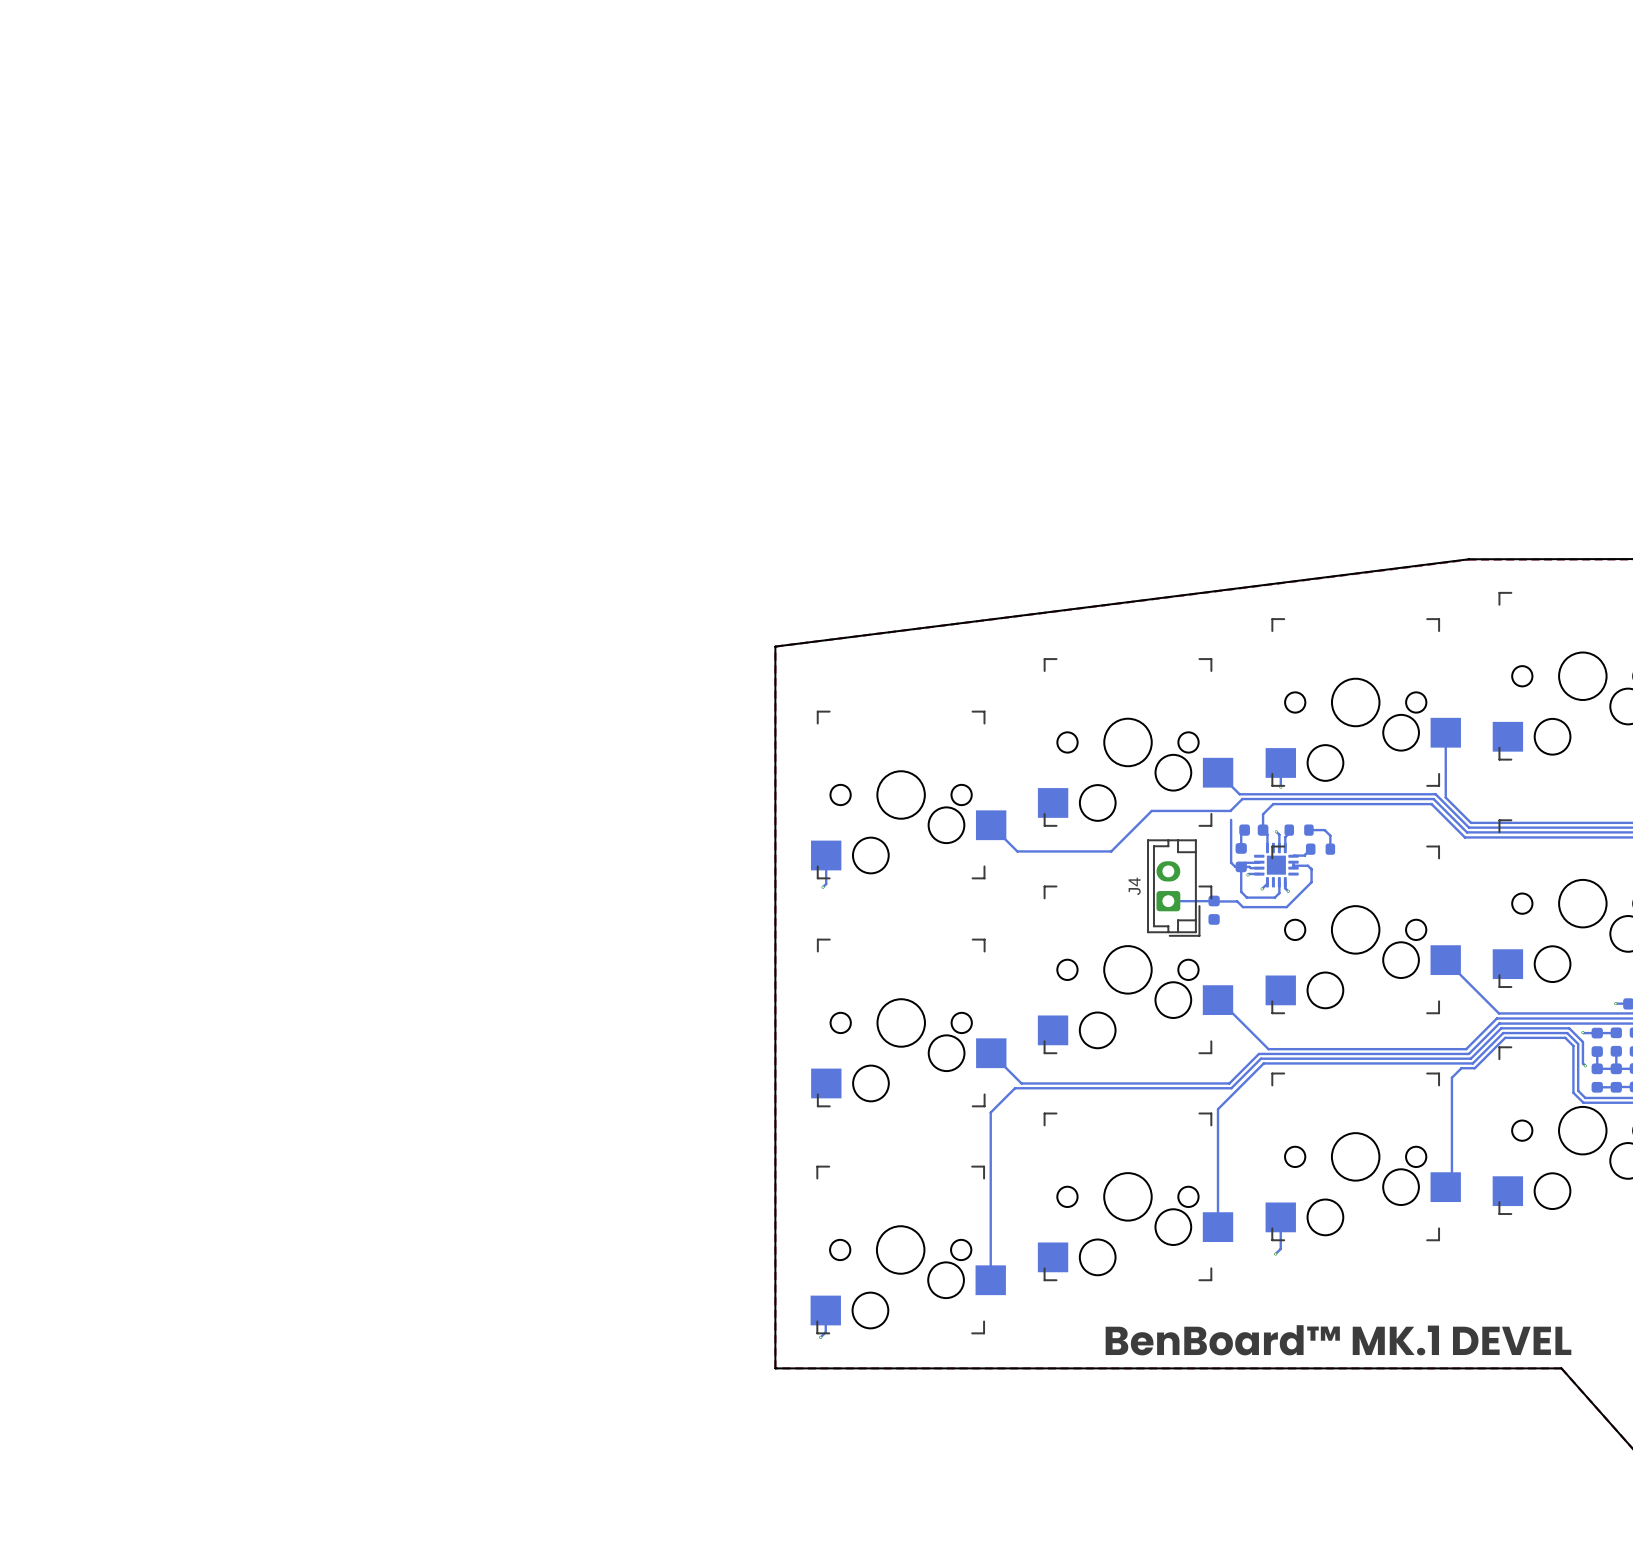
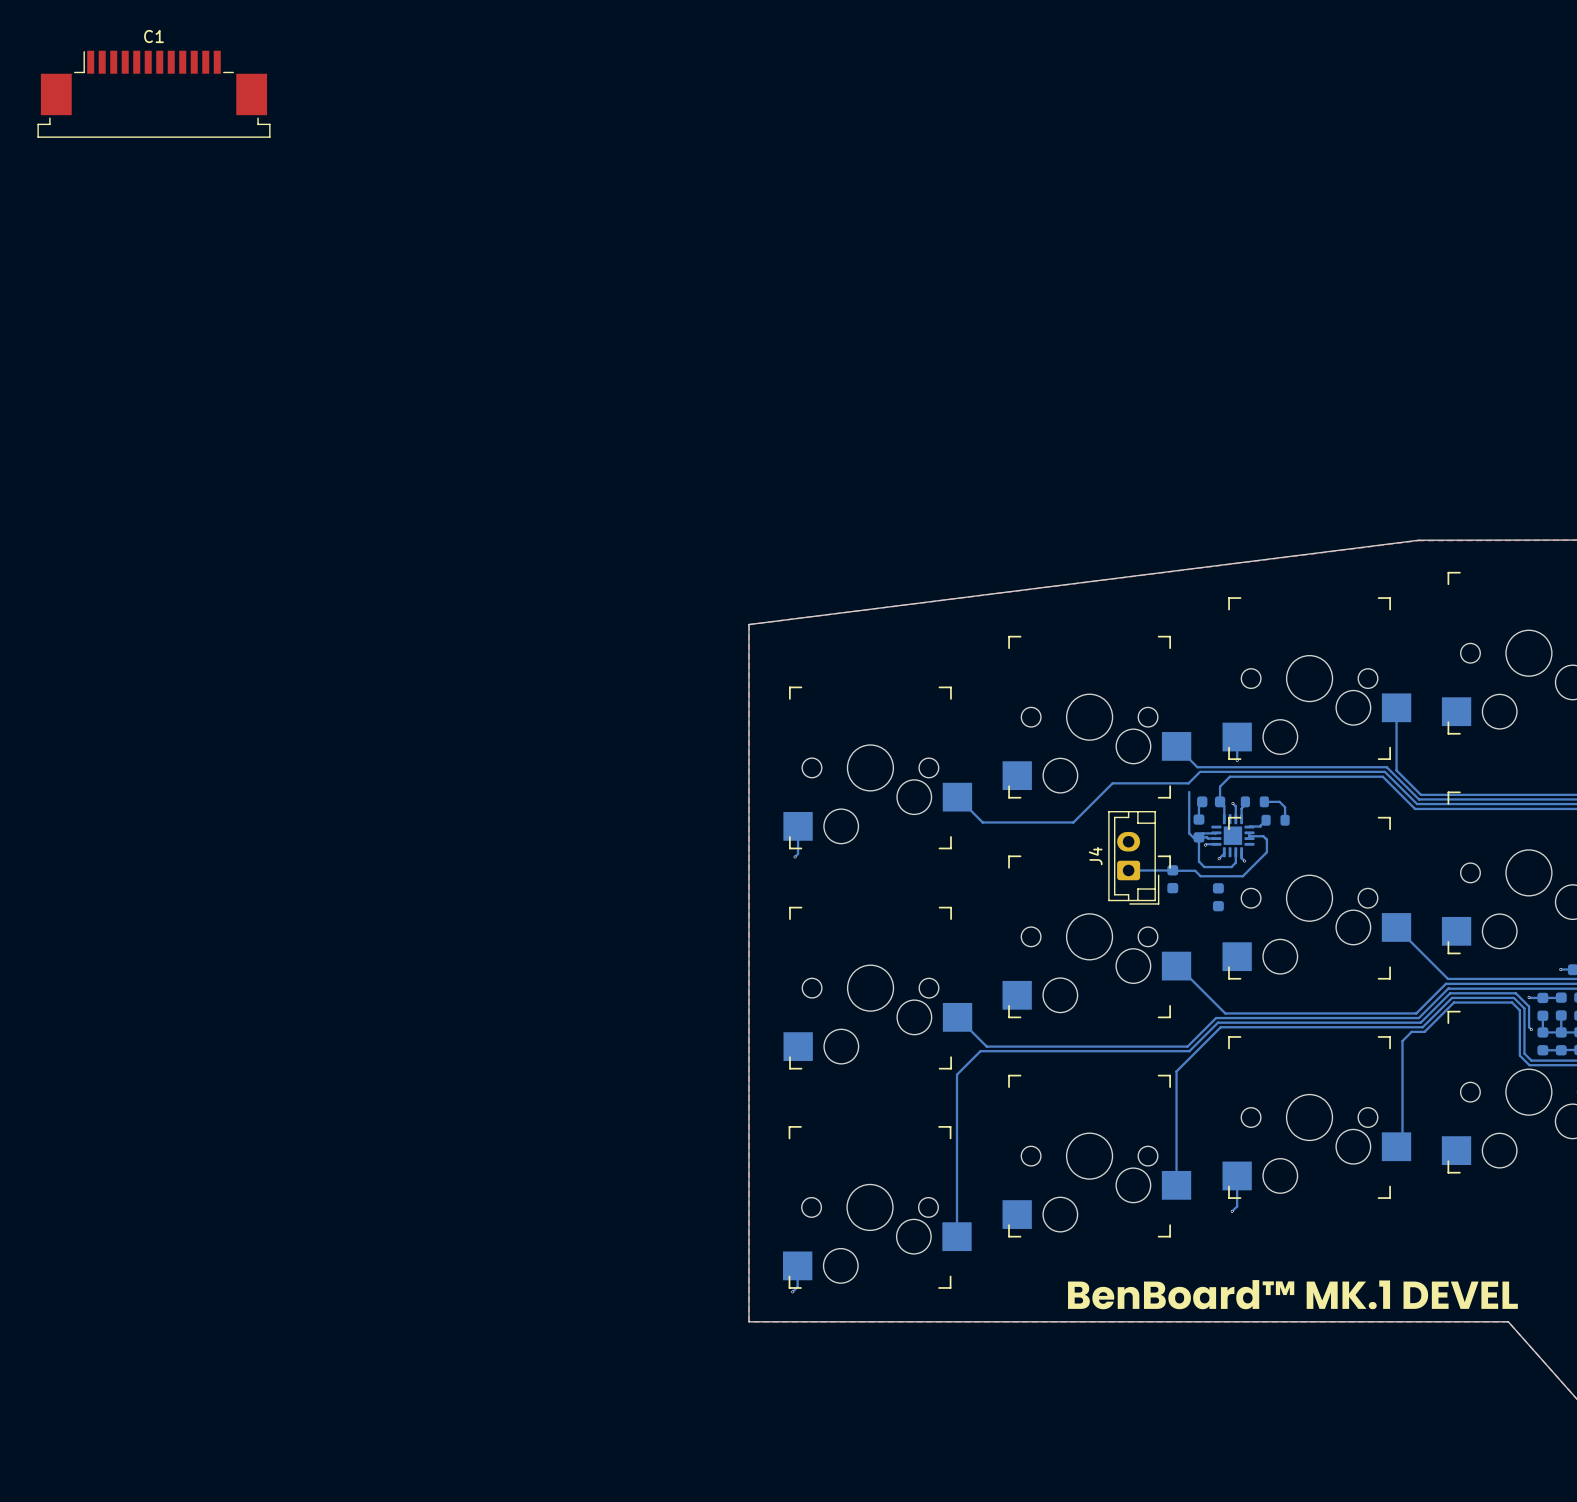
C1: none -> (153, 94)
part: none -> (1218, 897)

